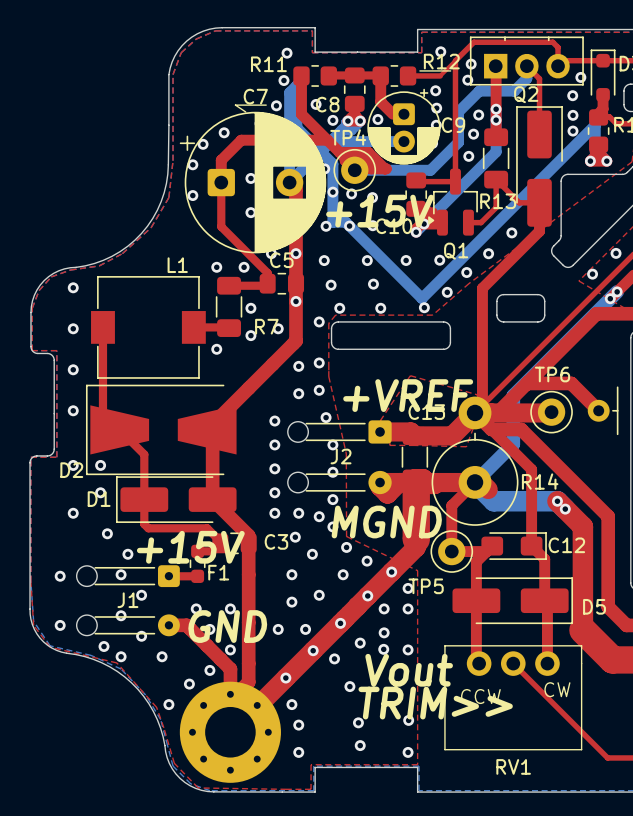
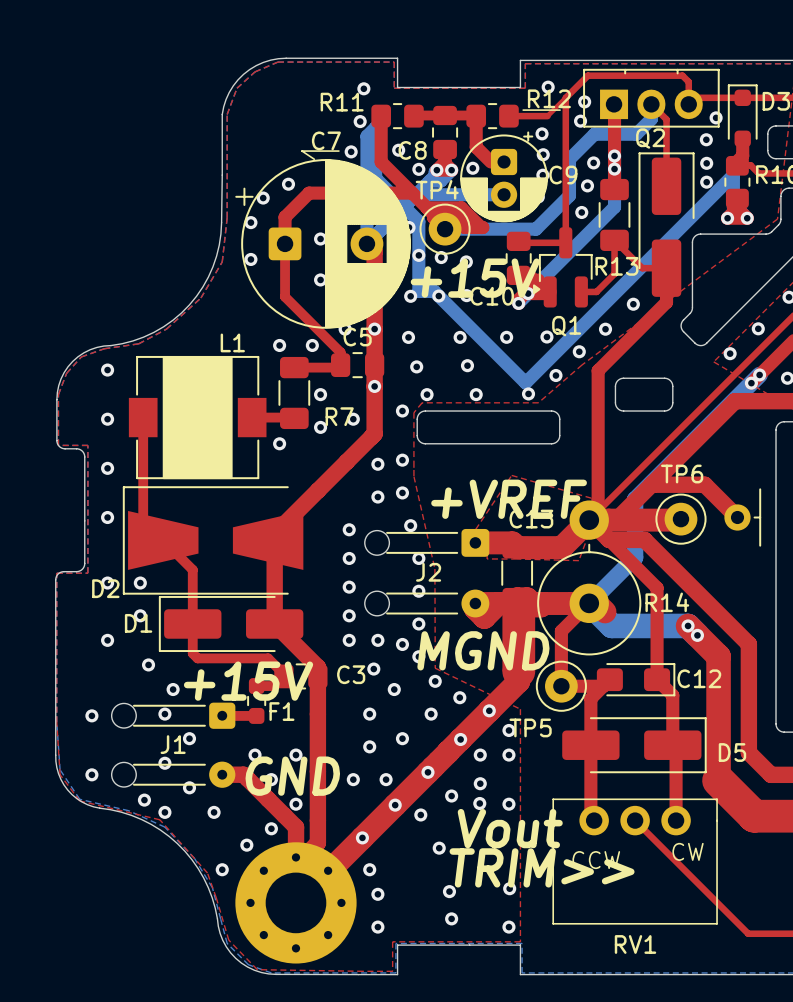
L1 footprint: [91, 276, 206, 379] -> [128, 355, 267, 480]

